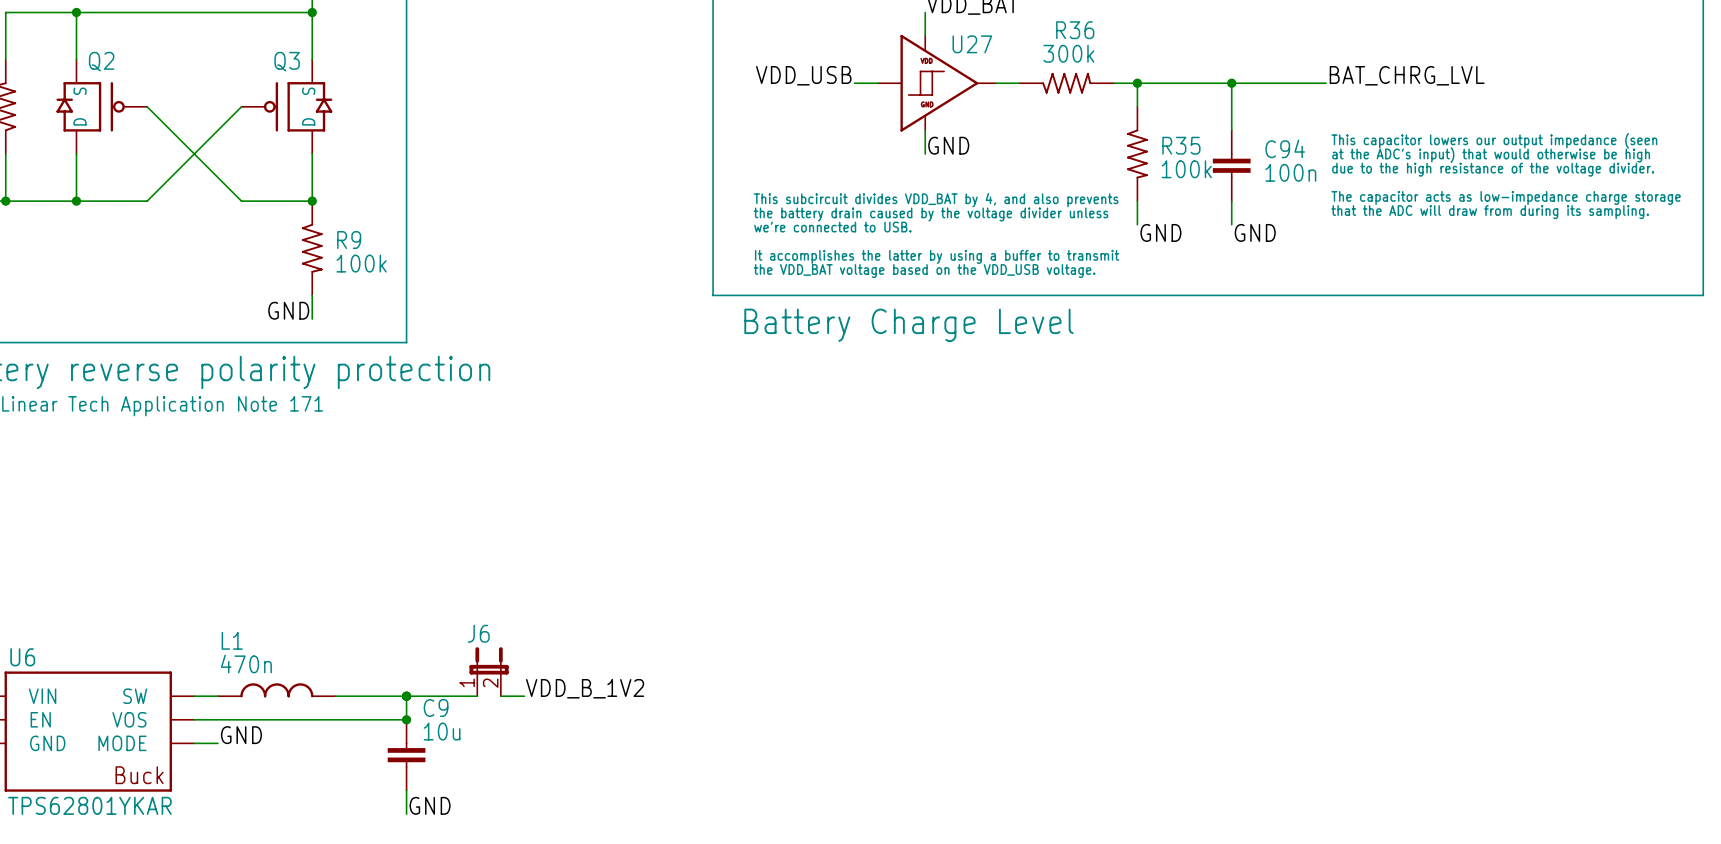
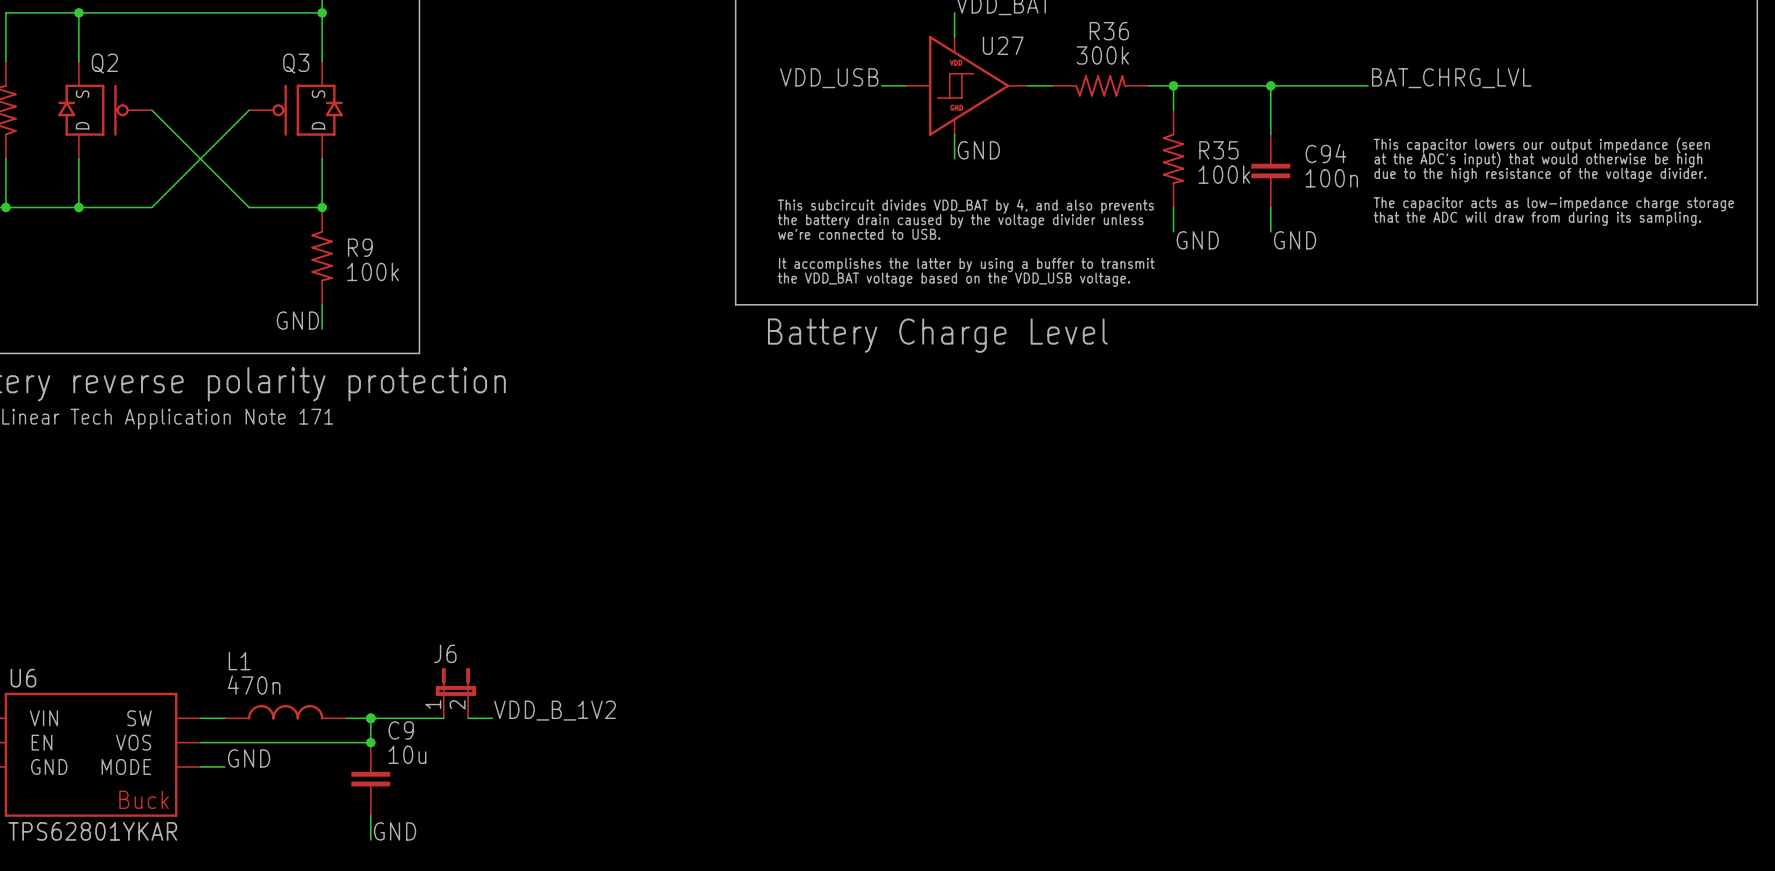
J6 position: (489, 671) -> (455, 693)
label position: VDD_B_1V2 (585, 688) -> VDD_B_1V2 (554, 710)
junction: none -> (370, 718)
wire: (406, 696) (406, 719) (359, 719) -> (370, 718) (370, 742)
junction: (406, 696) -> none
wire: (430, 696) (453, 696) -> none
wire: (500, 696) (524, 696) -> none
junction: none -> (370, 742)
junction: (406, 719) -> none
C9 position: (406, 755) -> (370, 779)
wire: (406, 790) (406, 814) -> (370, 815) (370, 839)
label position: GND (430, 805) -> GND (395, 831)

